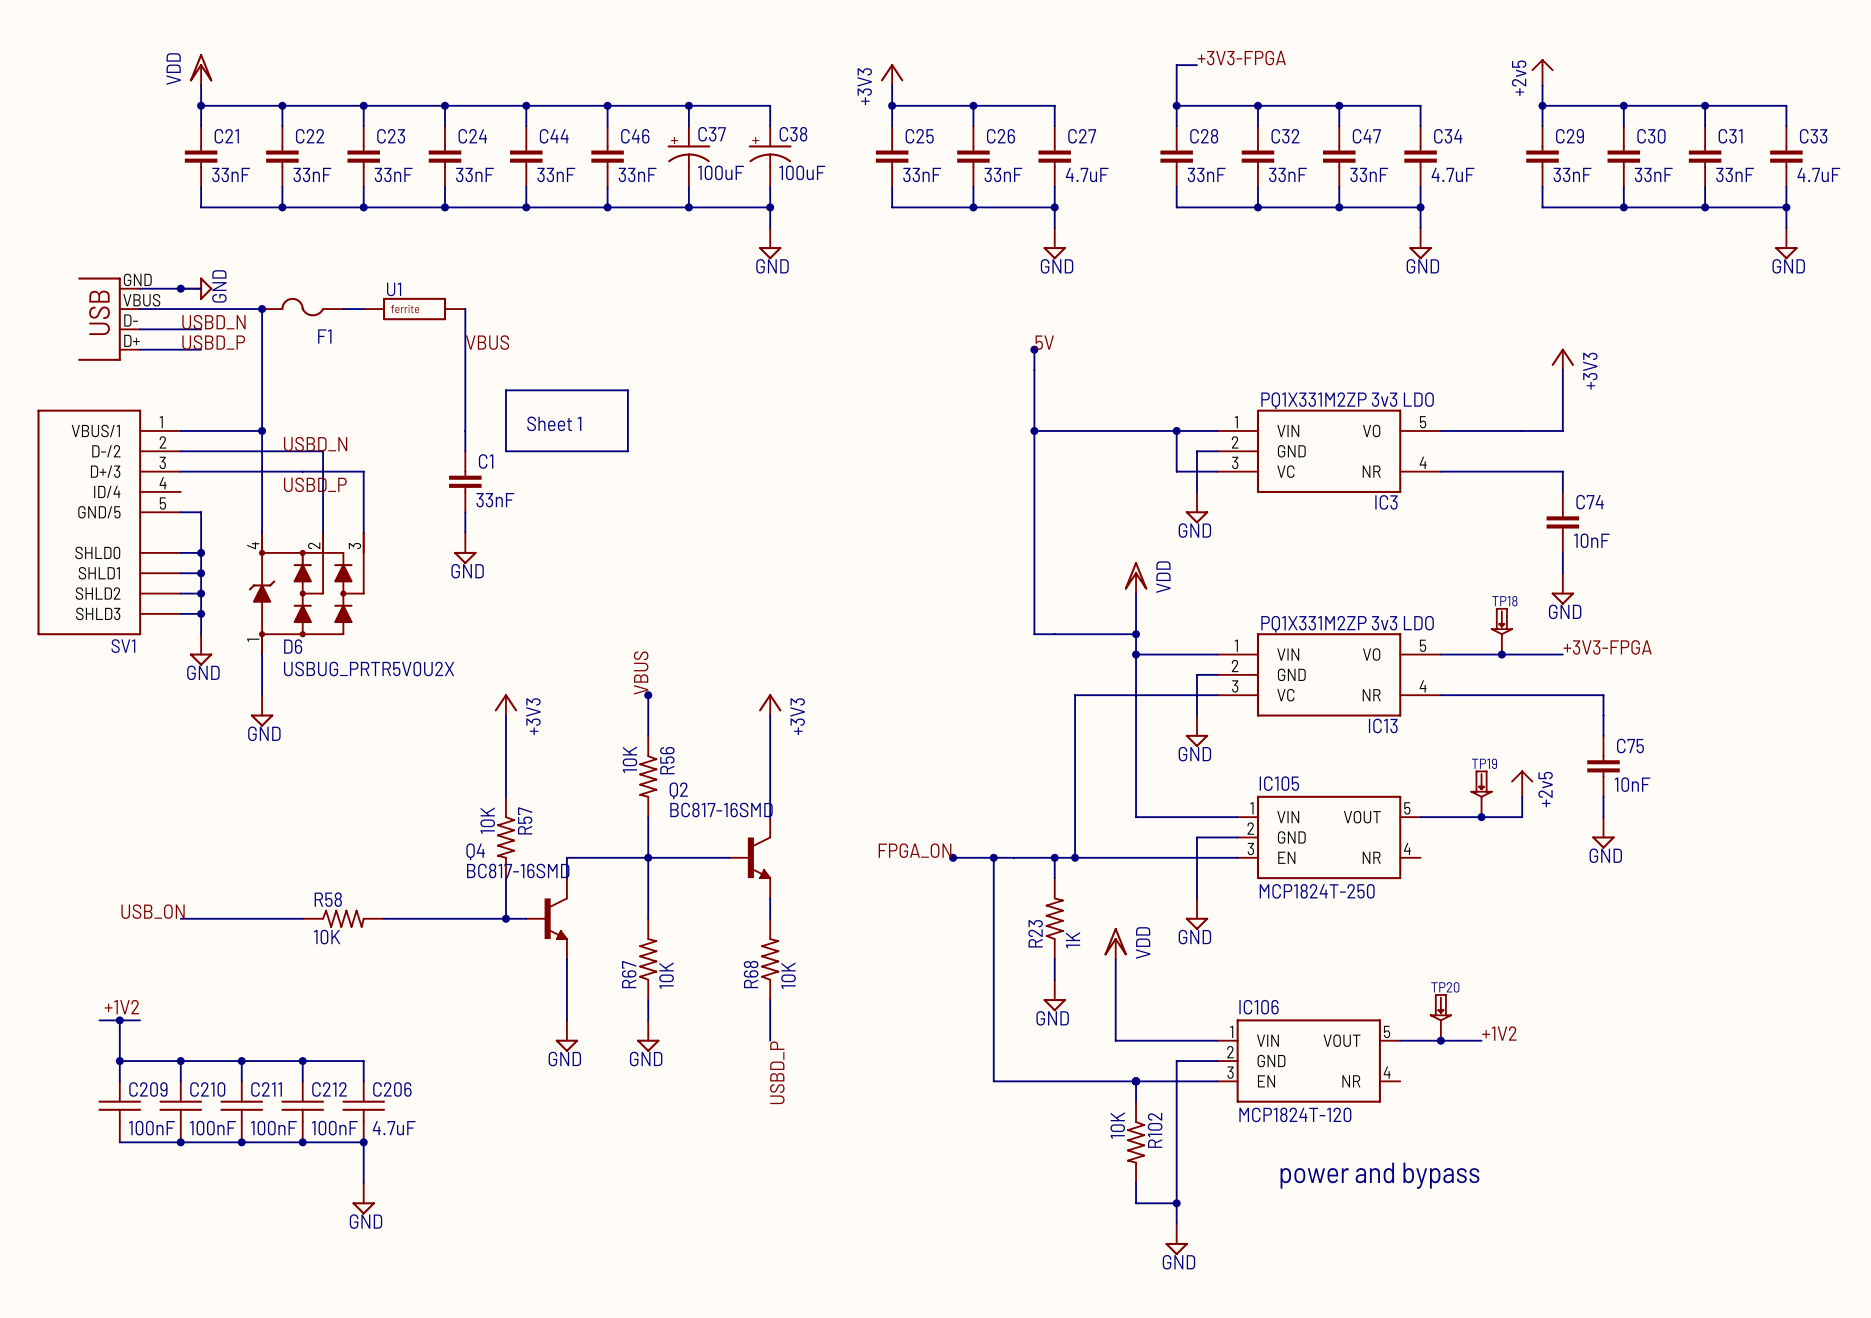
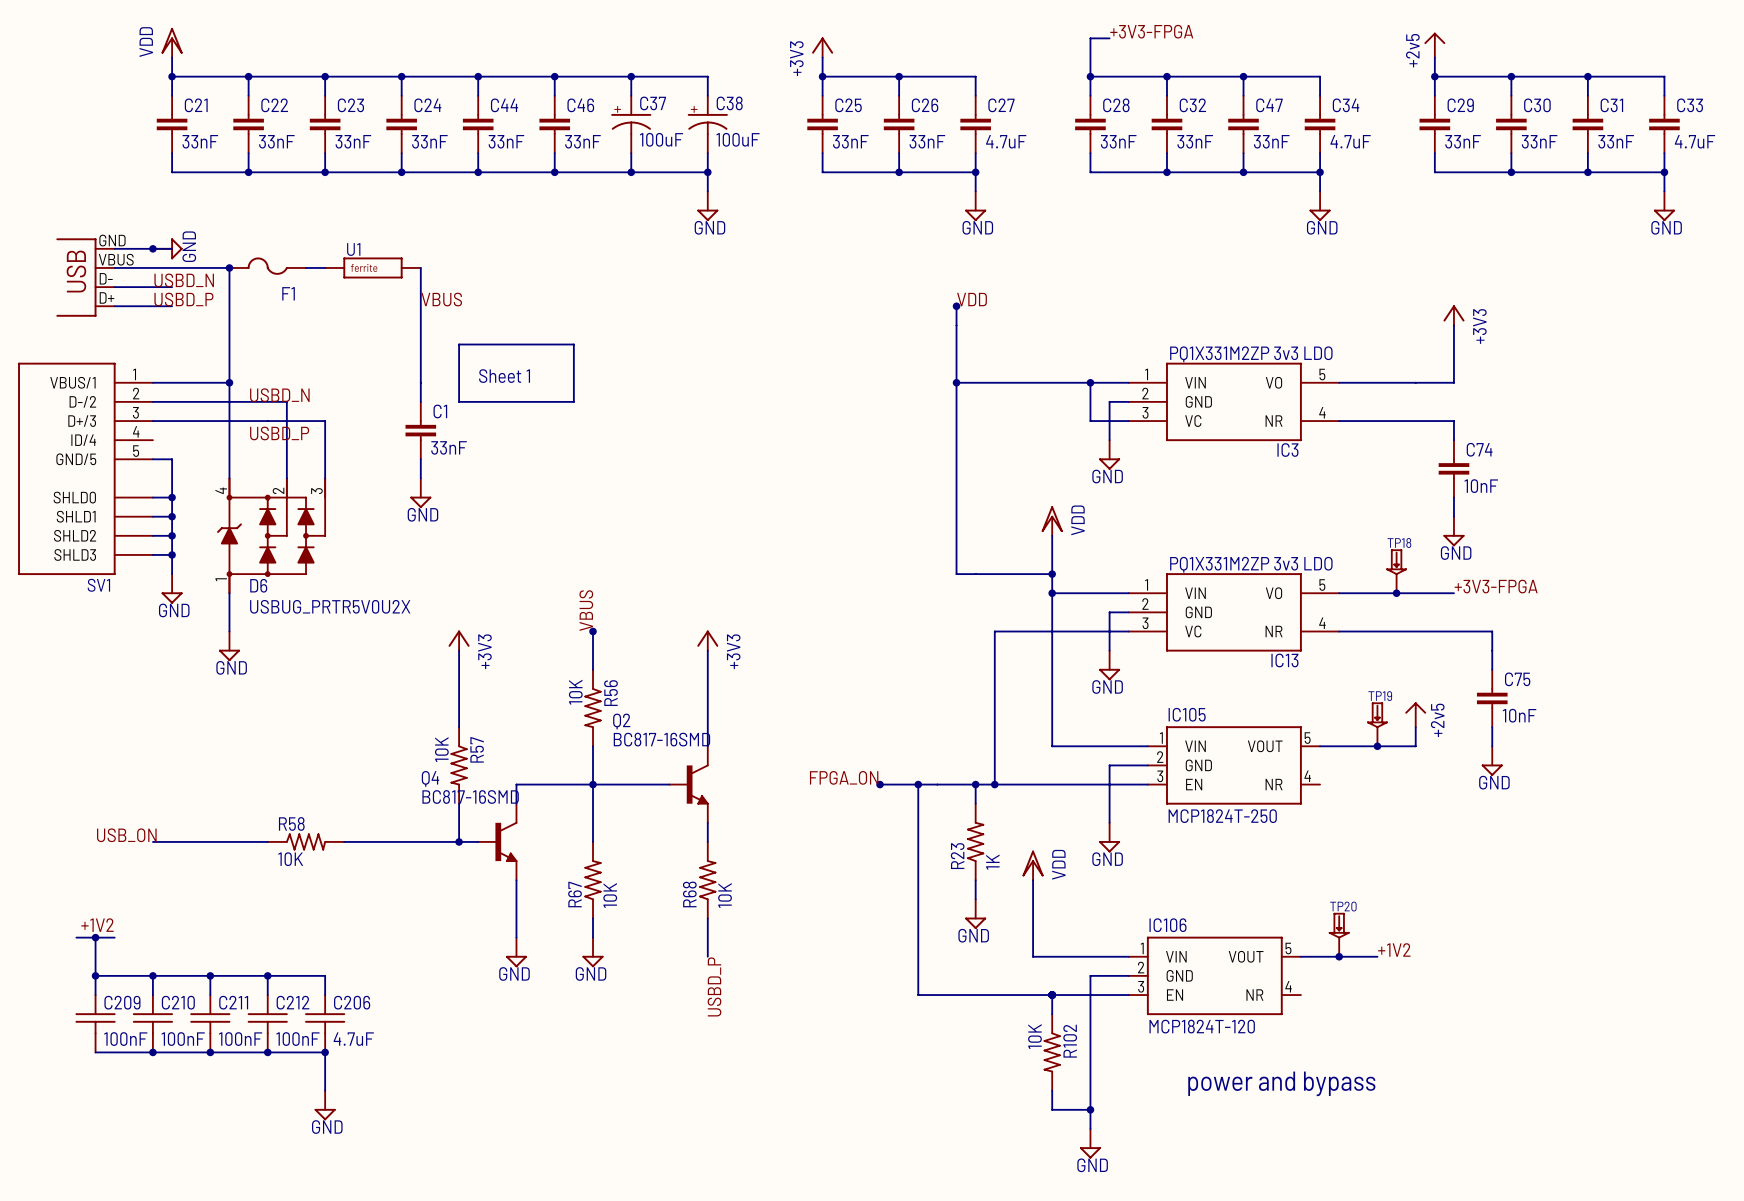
label: 5V (1044, 342) -> VDD (972, 299)

